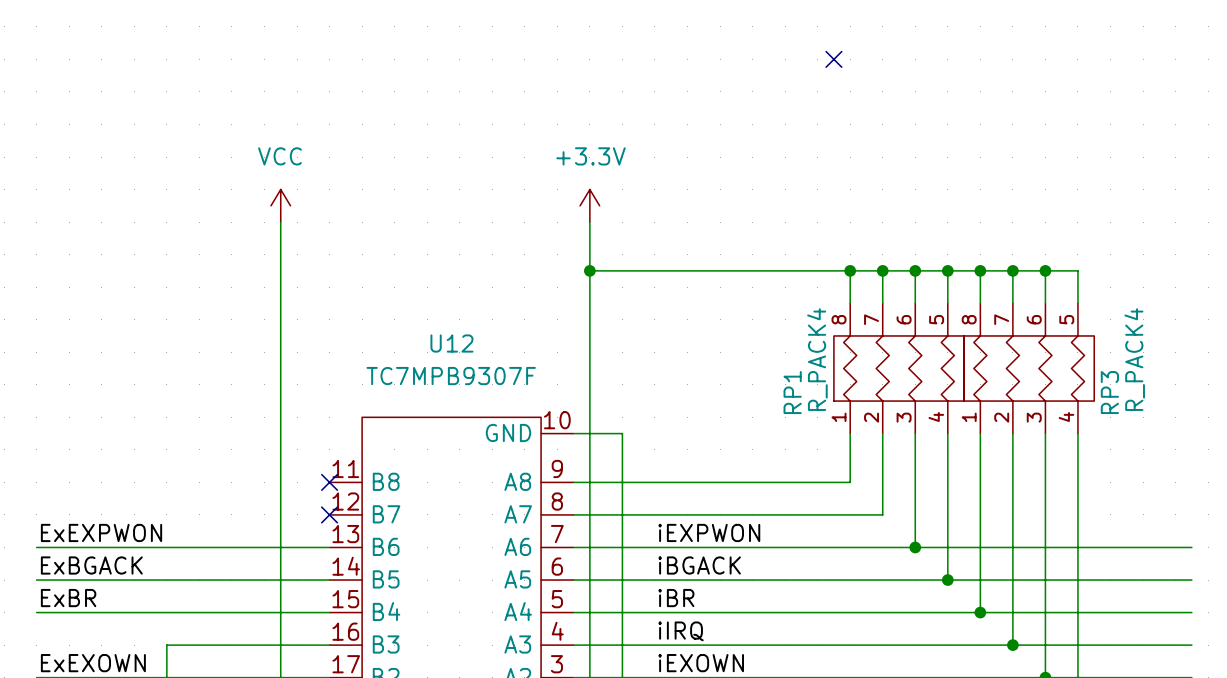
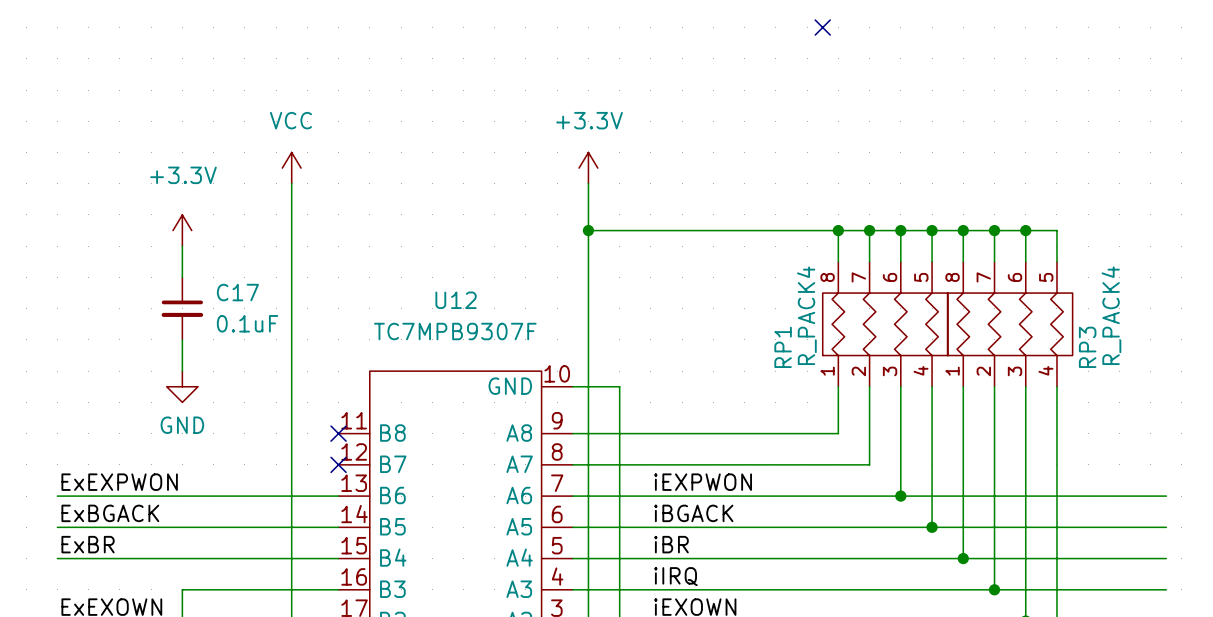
power symbol: none -> +3.3V (182, 230)
wire: none -> (182, 246) (182, 277)
C17: none -> 0.1uF (182, 308)
wire: none -> (182, 339) (182, 371)
power symbol: none -> GND (182, 386)

